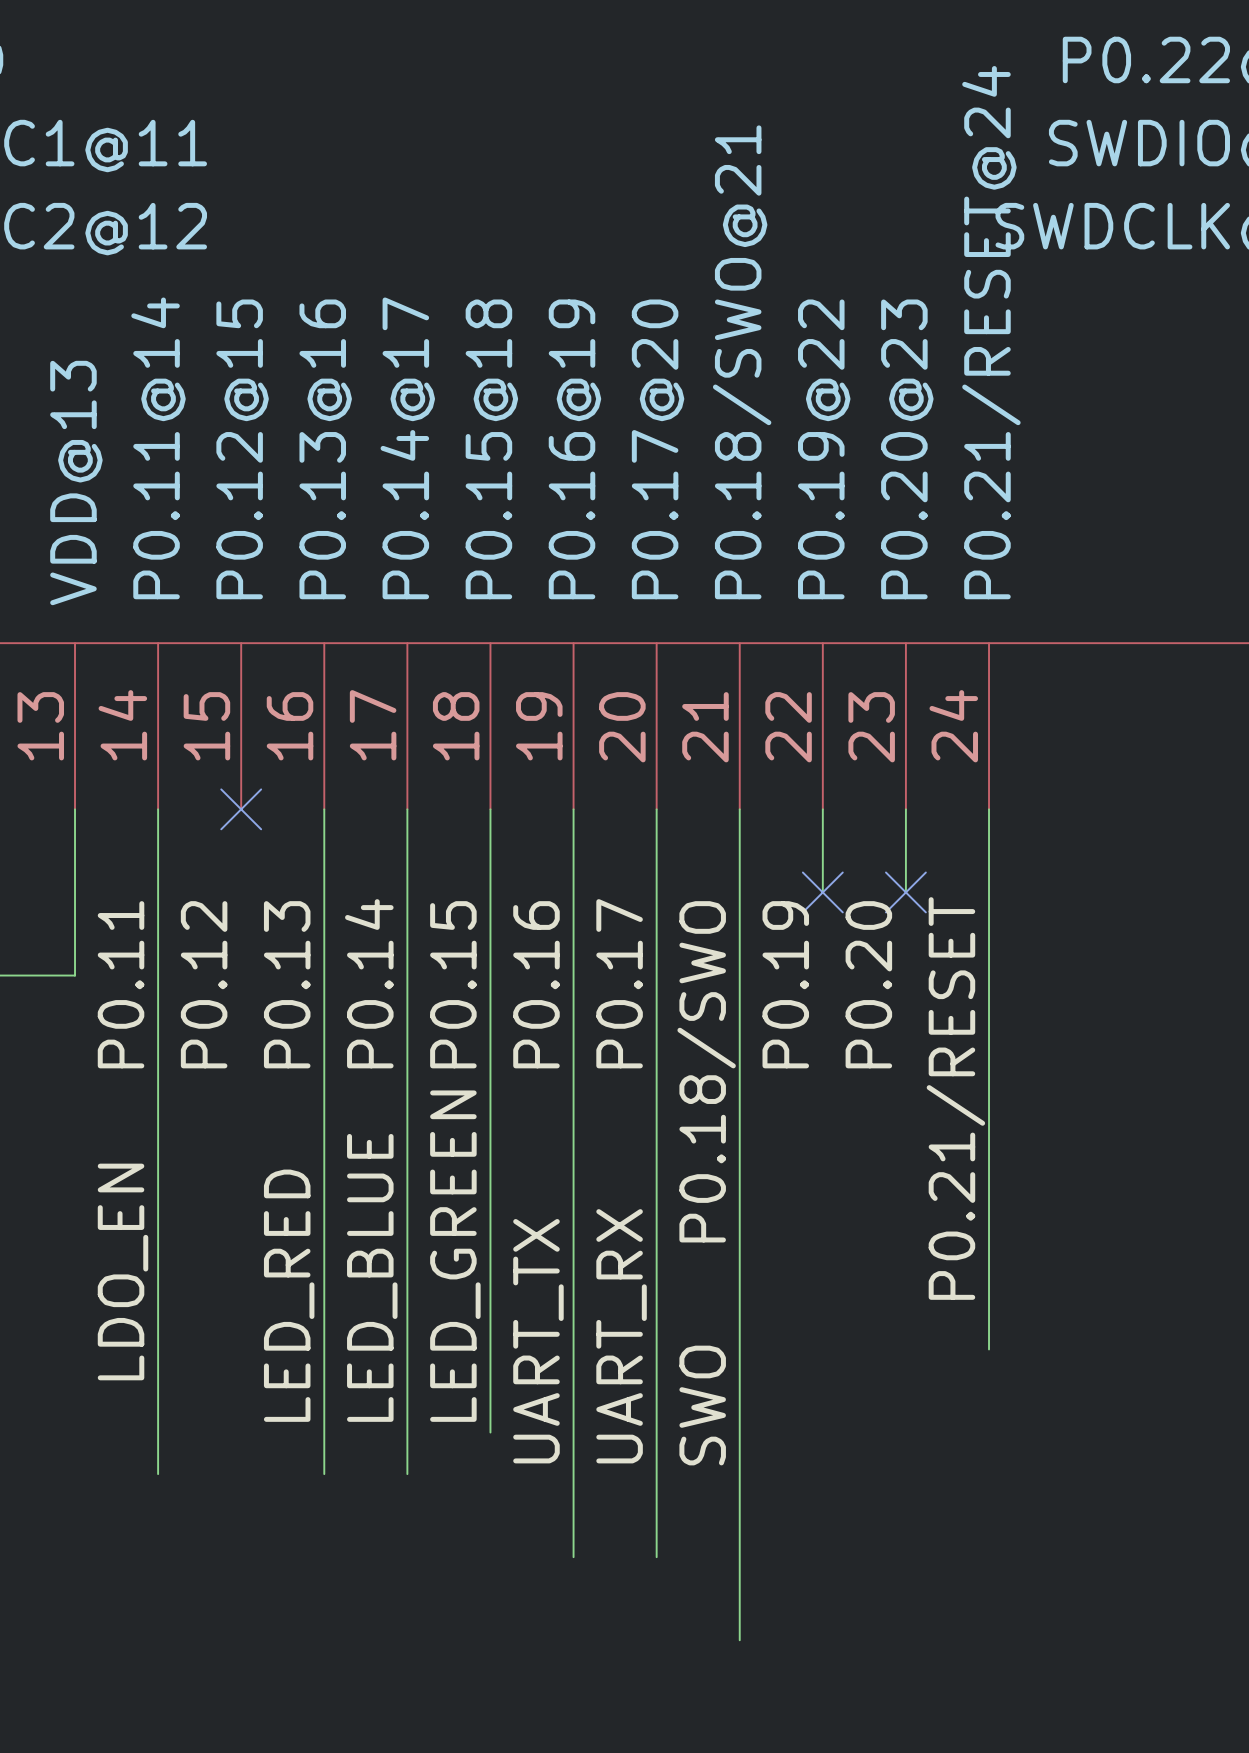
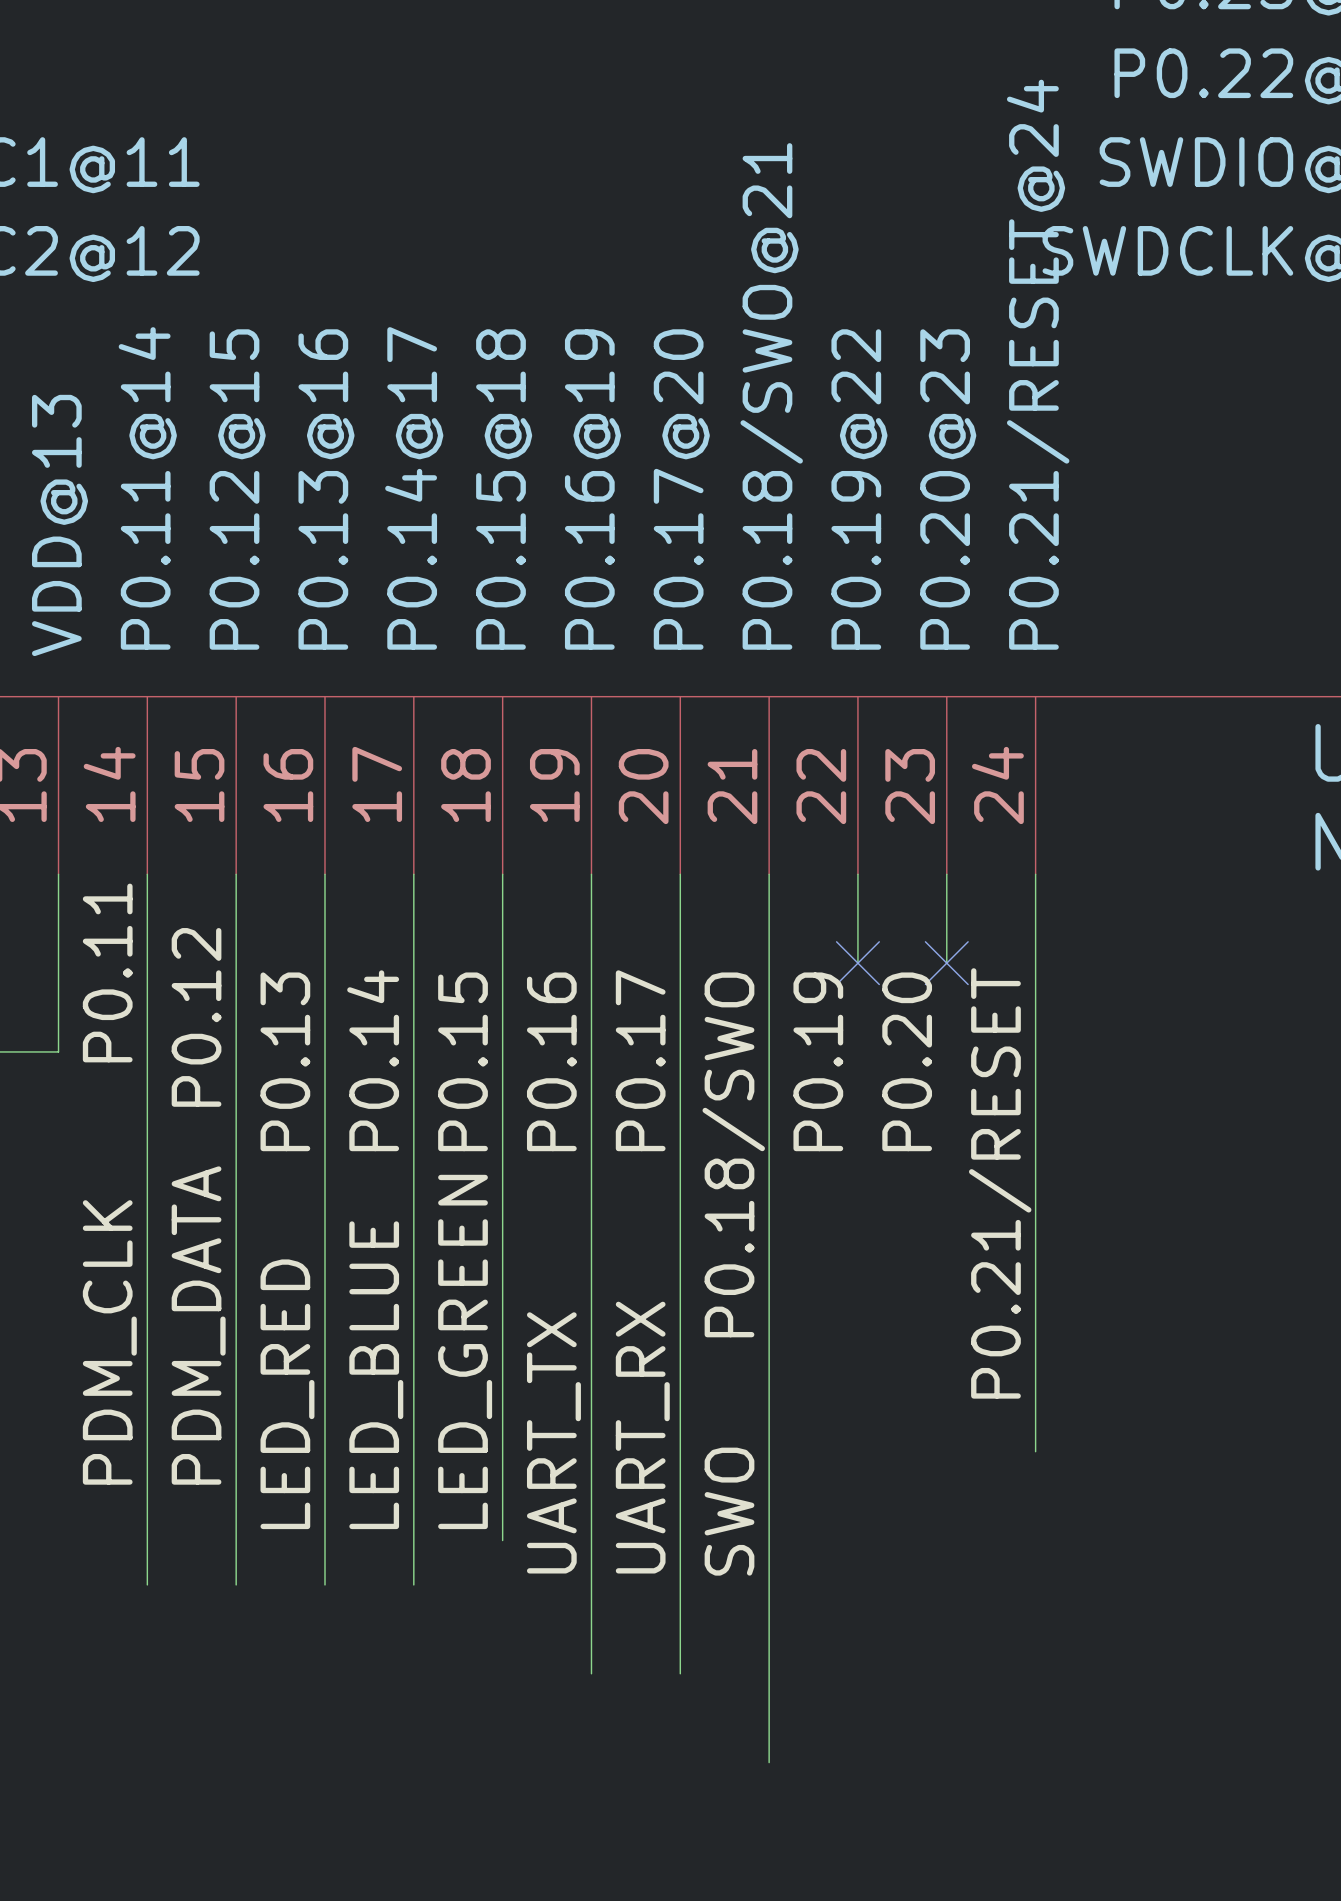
wire: none -> (236, 874) (236, 1584)
no-connect mark: (241, 809) -> none
label position: P0.11 (121, 984) -> P0.11 (107, 973)
label position: P0.12 (204, 984) -> P0.12 (196, 1017)
label: none -> PDM_DATA (198, 1325)
label: LDO_EN (123, 1271) -> PDM_CLK (109, 1342)

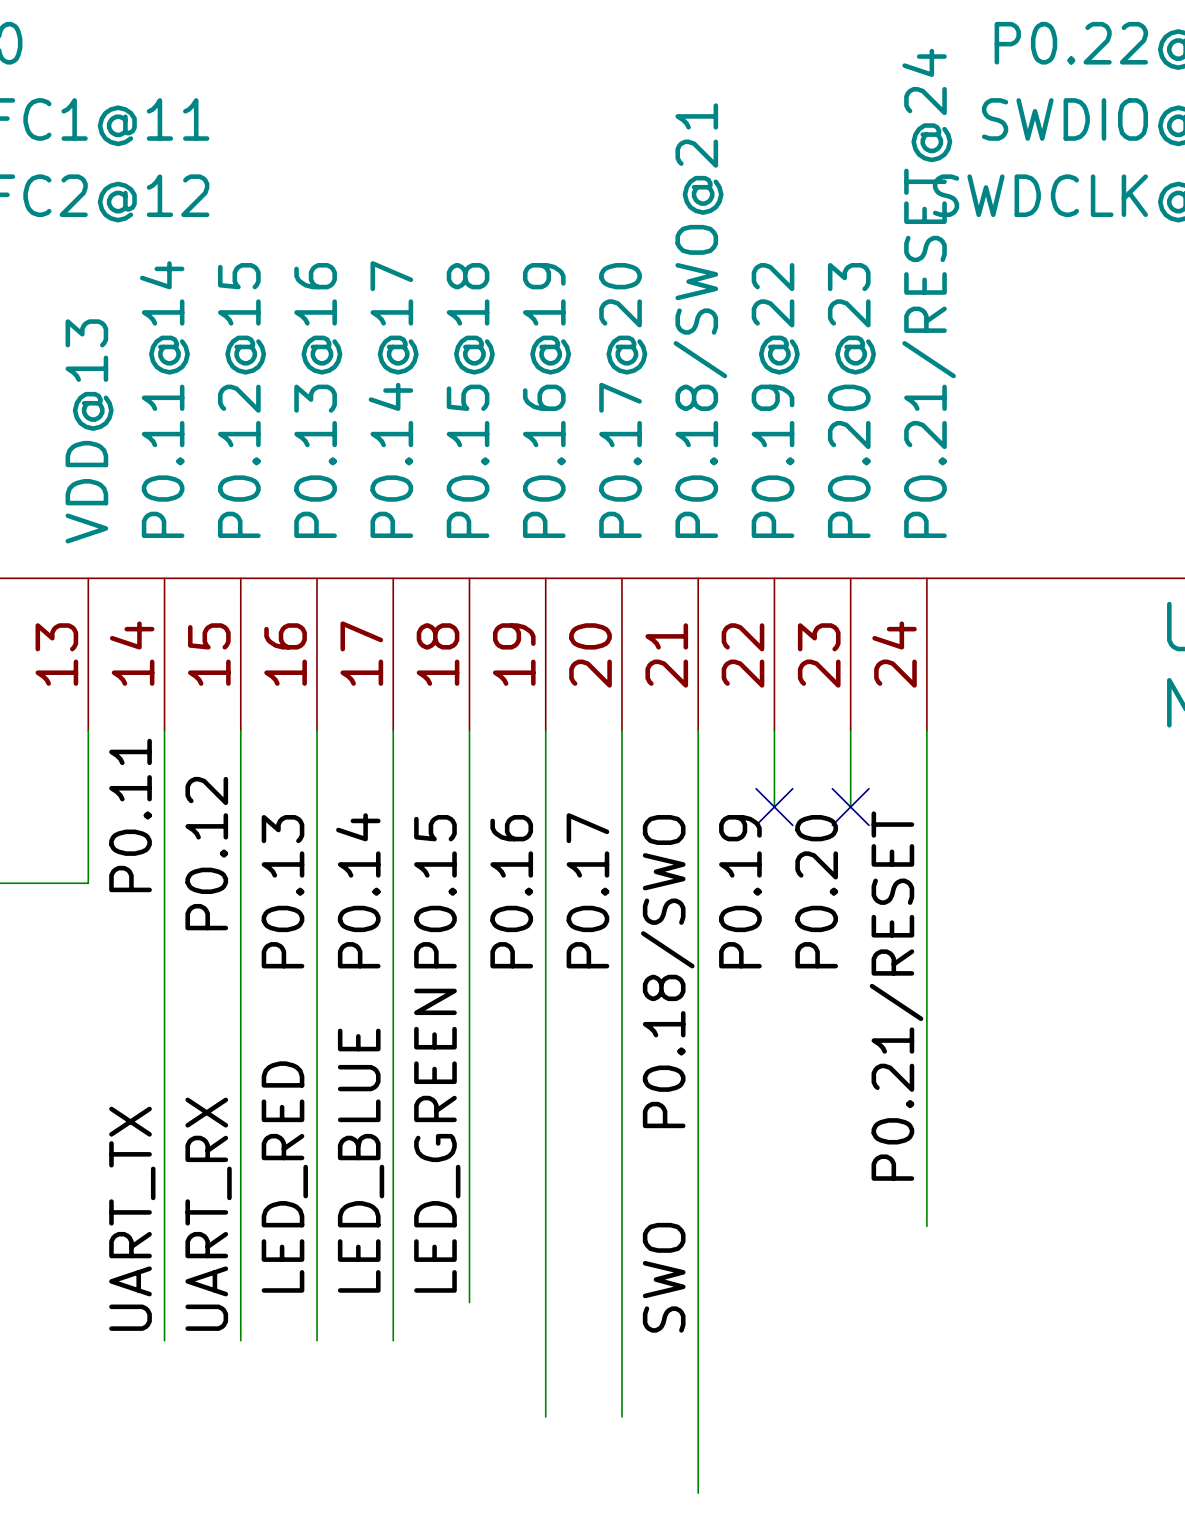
label: PDM_DATA (198, 1325) -> none
label: PDM_CLK (109, 1342) -> none
label position: UART_RX (642, 1437) -> UART_RX (208, 1214)
label position: UART_TX (553, 1442) -> UART_TX (132, 1218)

